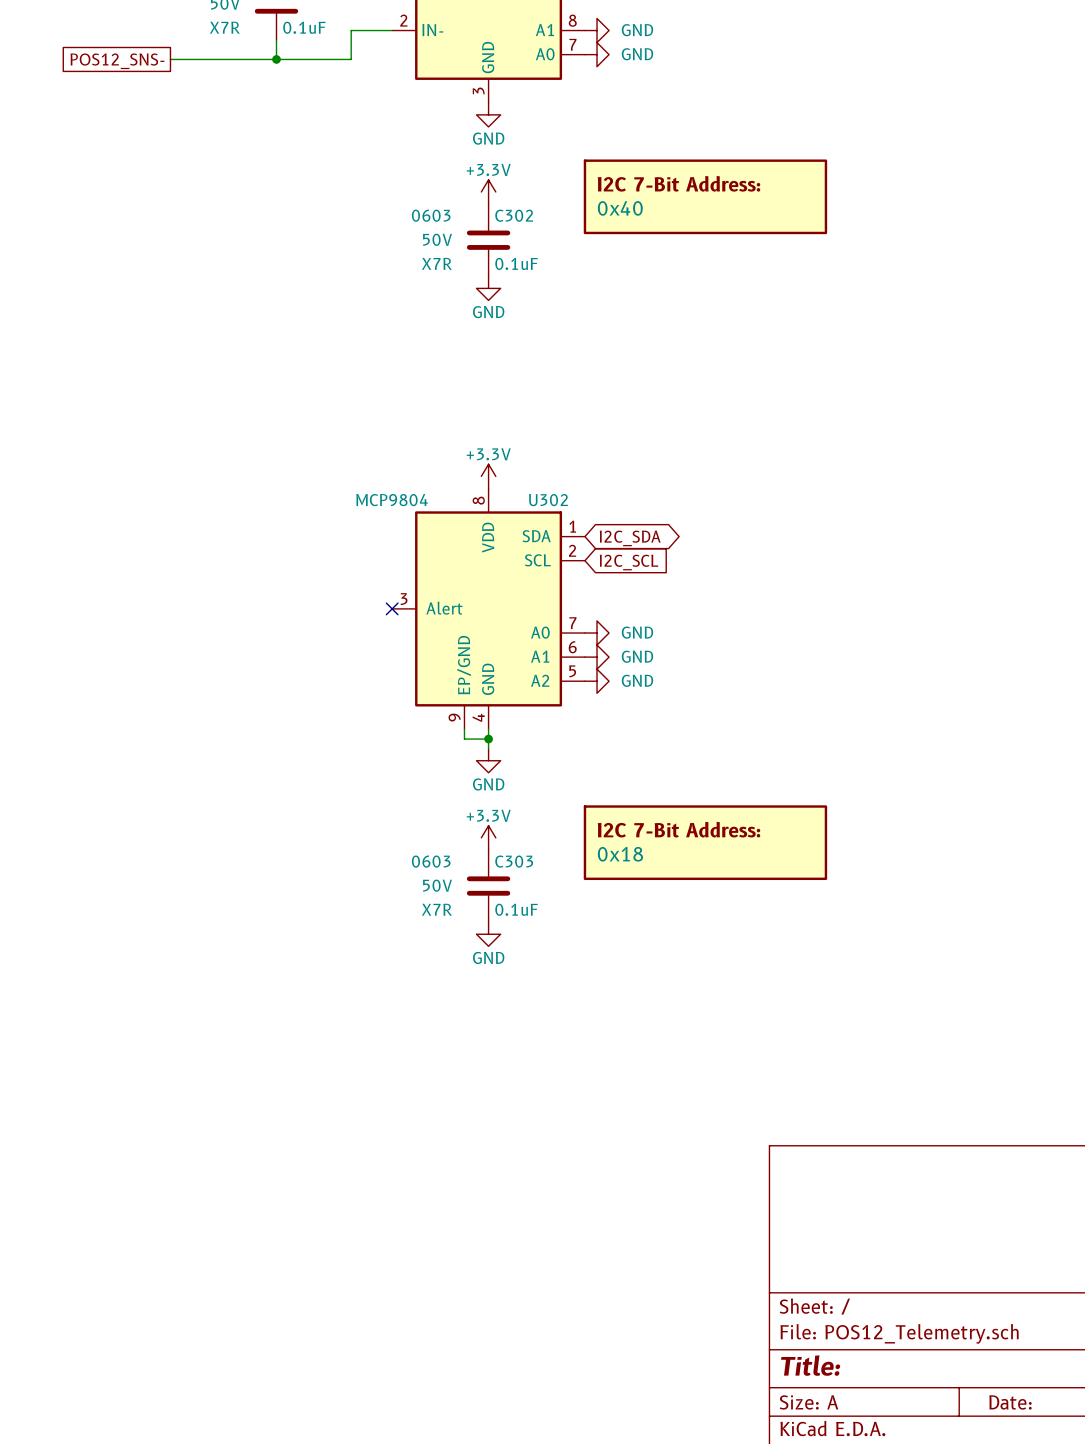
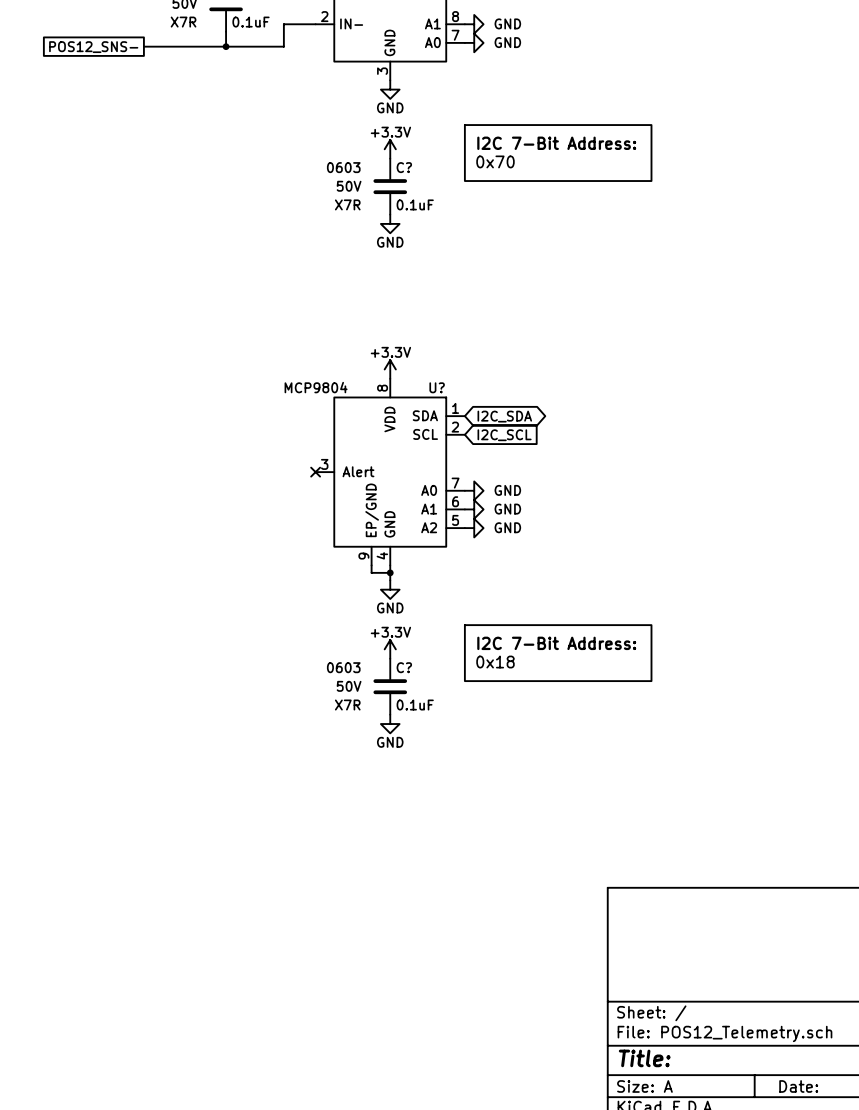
part value: 0x40 (620, 208) -> 0x70 (495, 161)
C302 name: C302 (514, 215) -> C? (404, 167)
U302 name: U302 (548, 500) -> U? (437, 387)
C303 name: C303 (514, 861) -> C? (404, 667)

